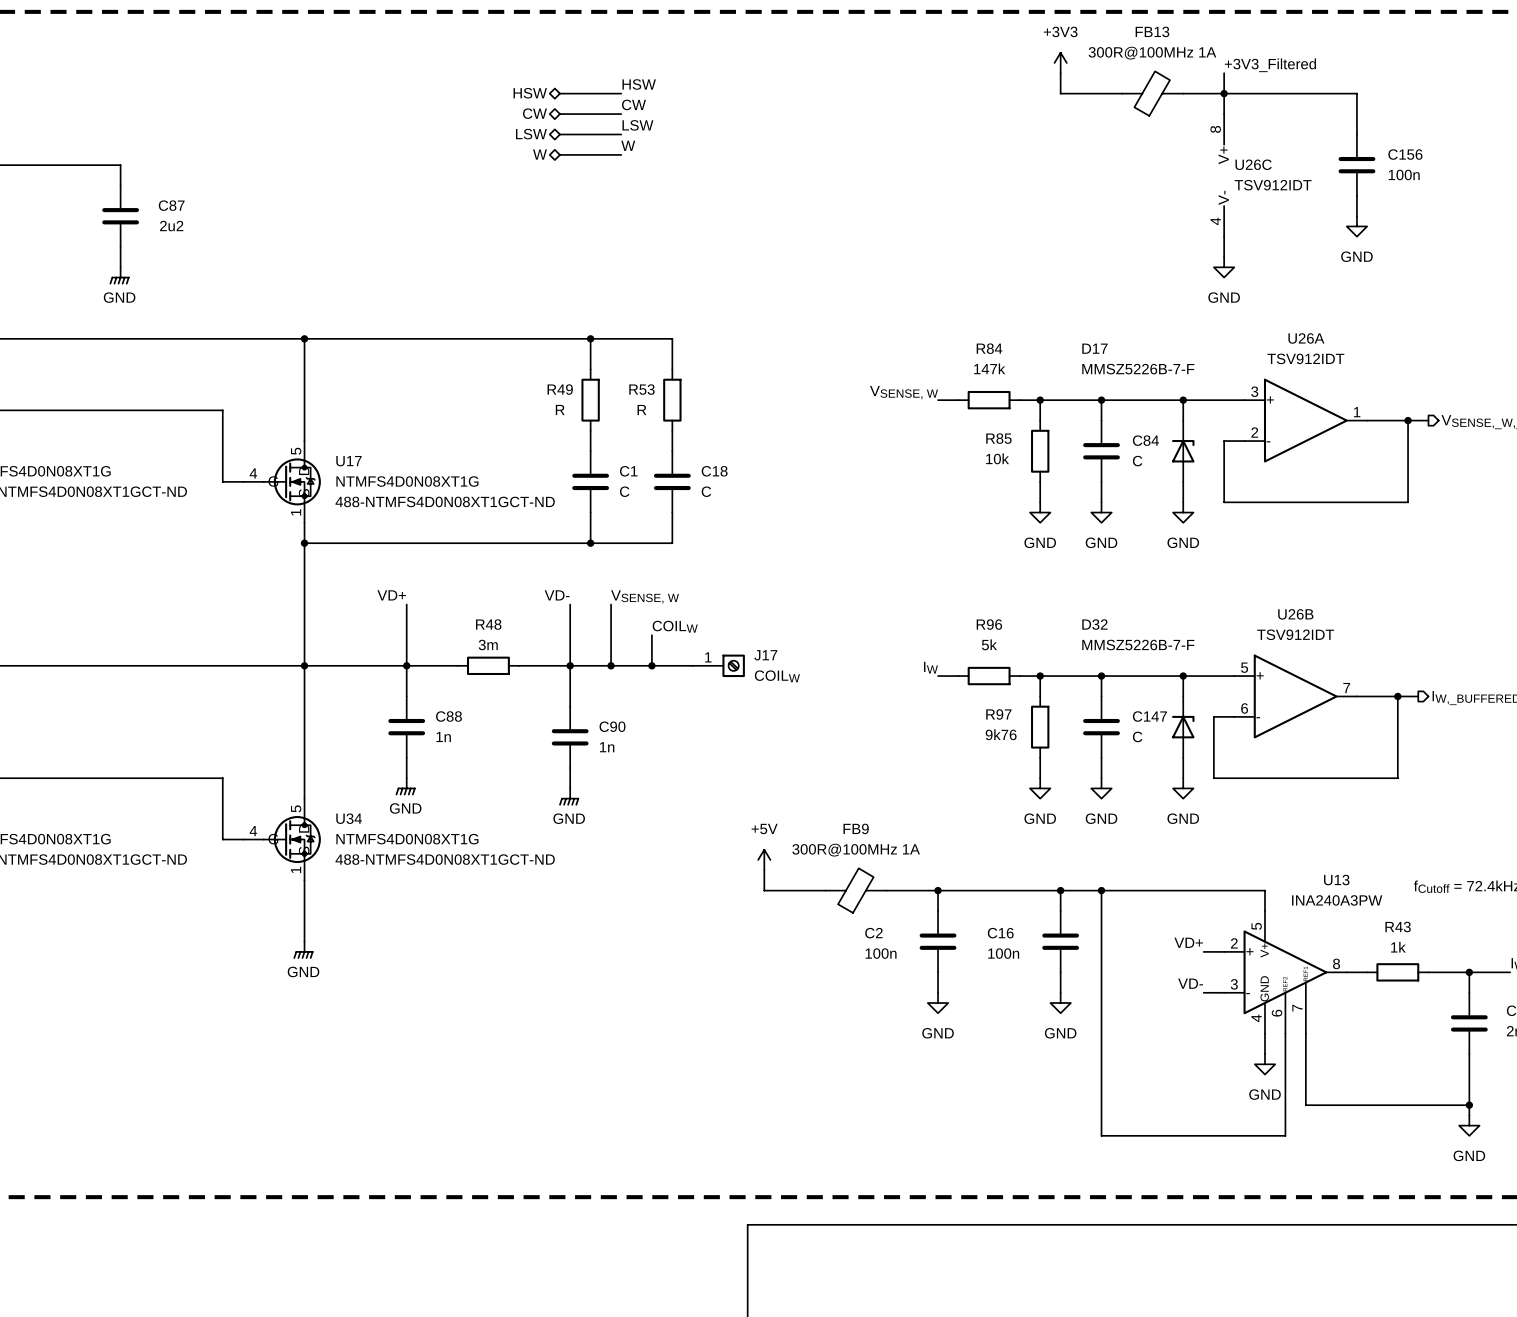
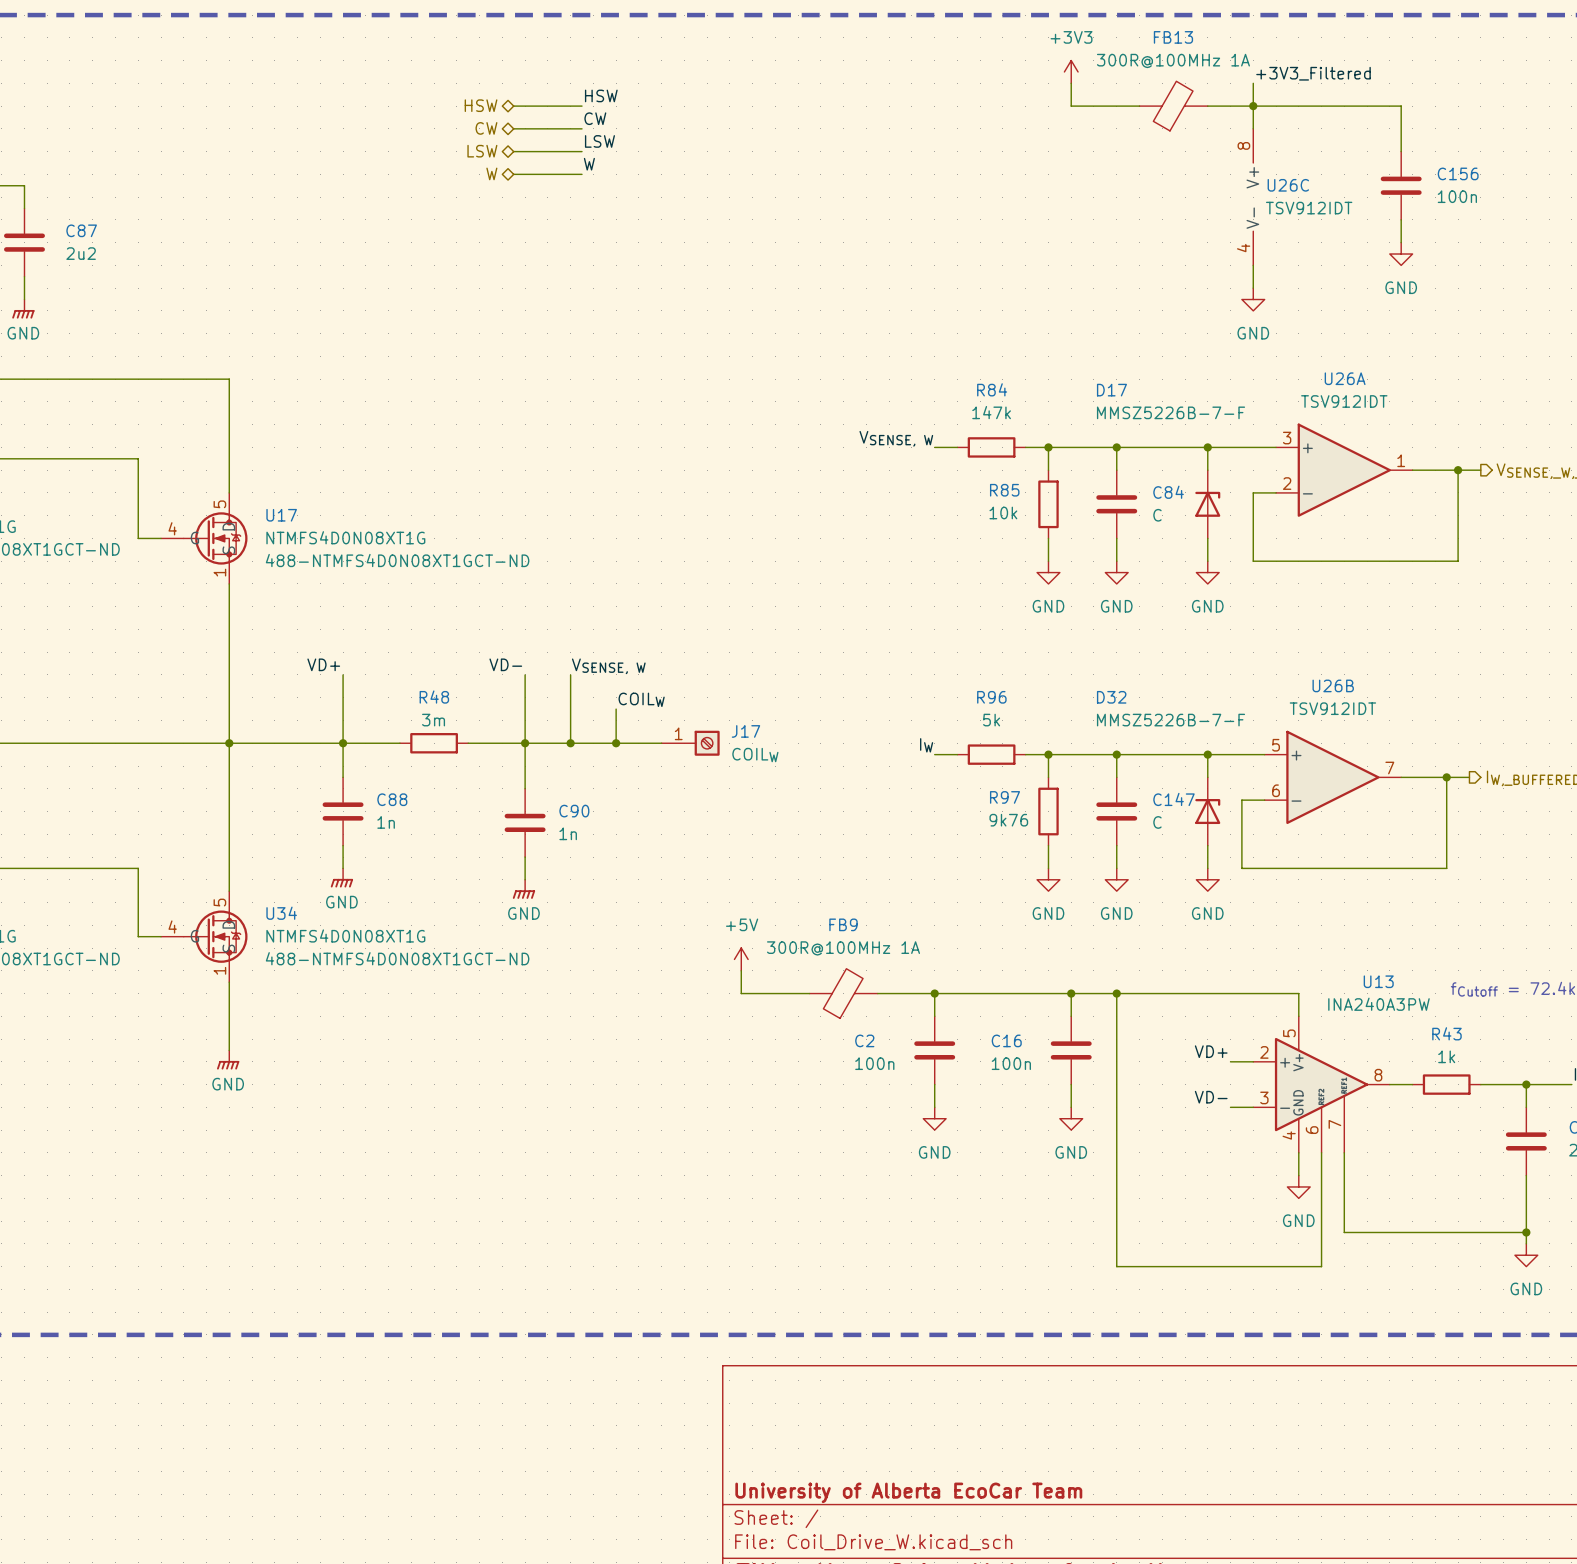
wire: (304, 338) (672, 338) (672, 369) -> none
junction: (304, 338) -> none
wire: (590, 338) (590, 369) -> none
junction: (590, 338) -> none
R49: R (590, 400) -> none
R53: R (672, 400) -> none
wire: (590, 430) (590, 451) -> none
wire: (672, 430) (672, 451) -> none
C1: C (590, 481) -> none
C18: C (672, 481) -> none
wire: (590, 512) (590, 543) -> none
wire: (672, 512) (672, 543) (304, 543) -> none
junction: (304, 543) -> none
junction: (590, 543) -> none

